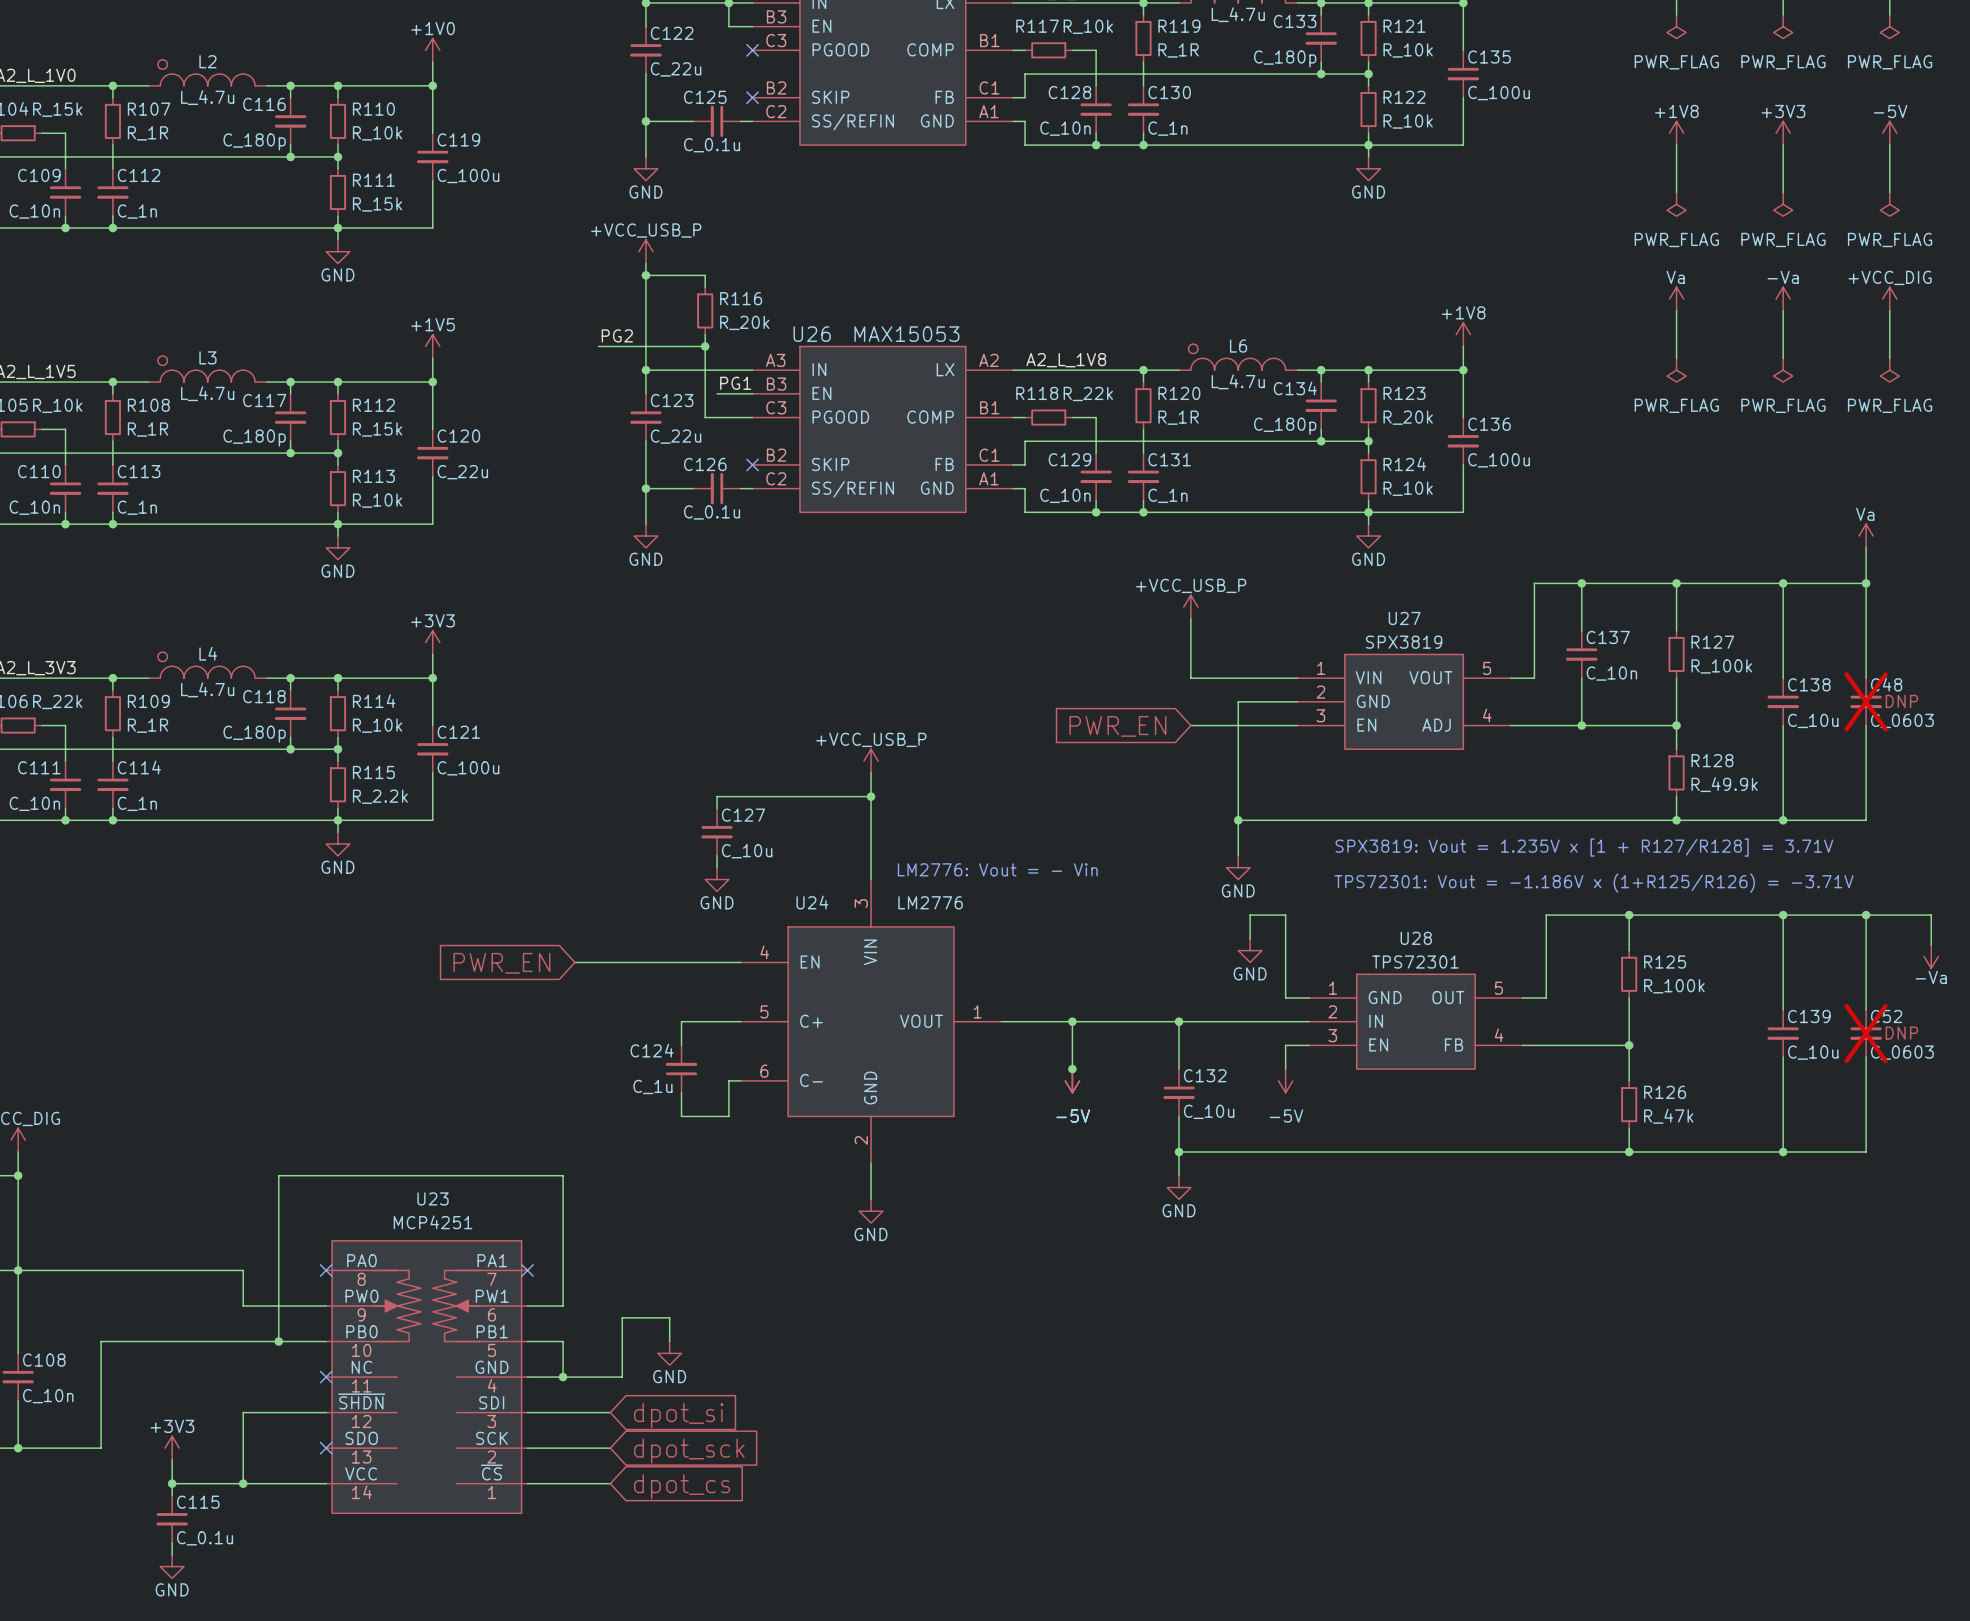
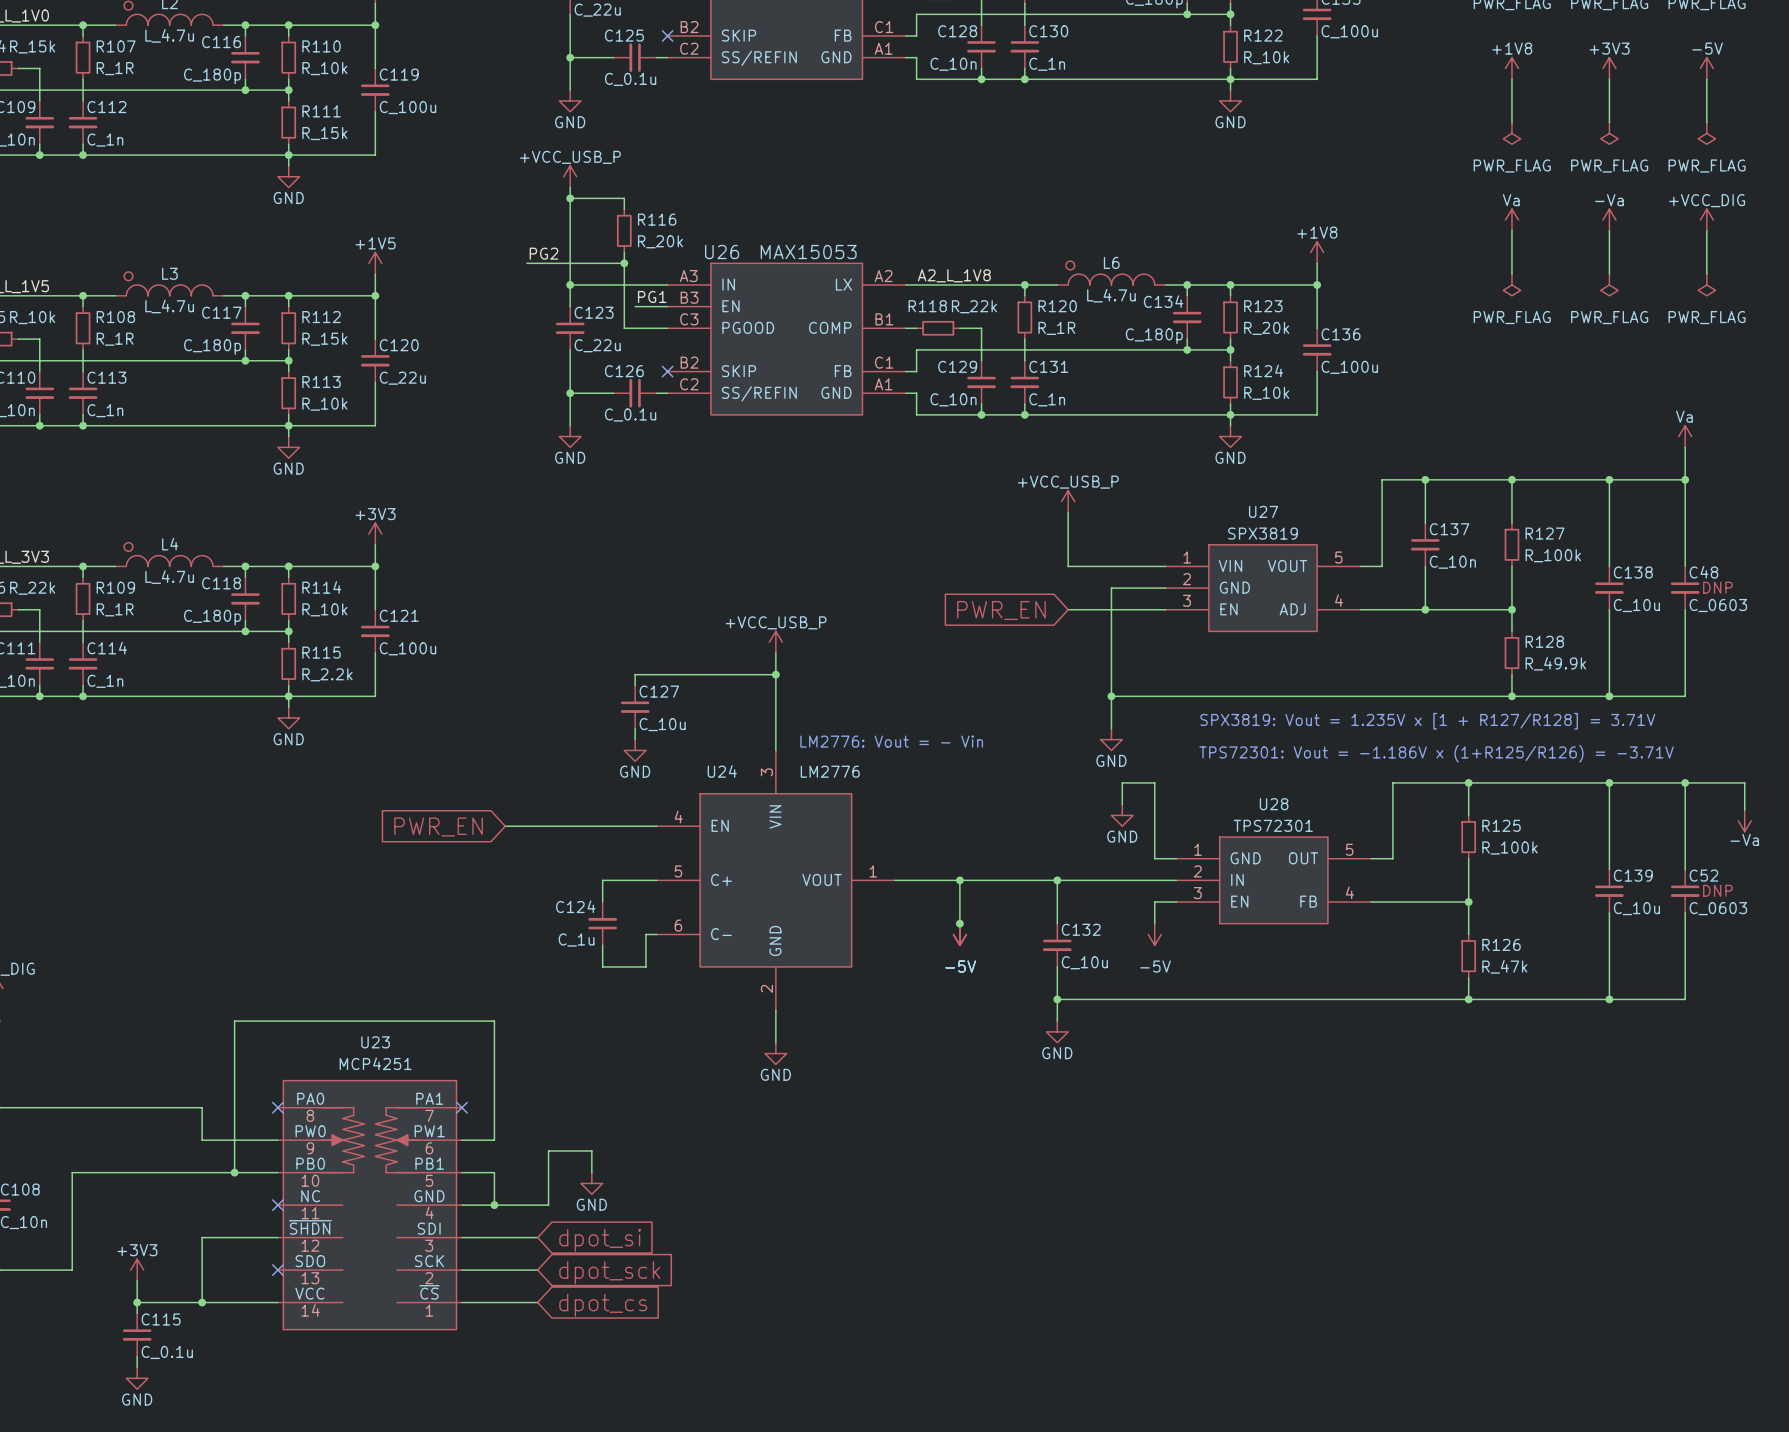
C48 do-not-place cross: (1866, 701) -> none
C52 do-not-place cross: (1866, 1033) -> none

